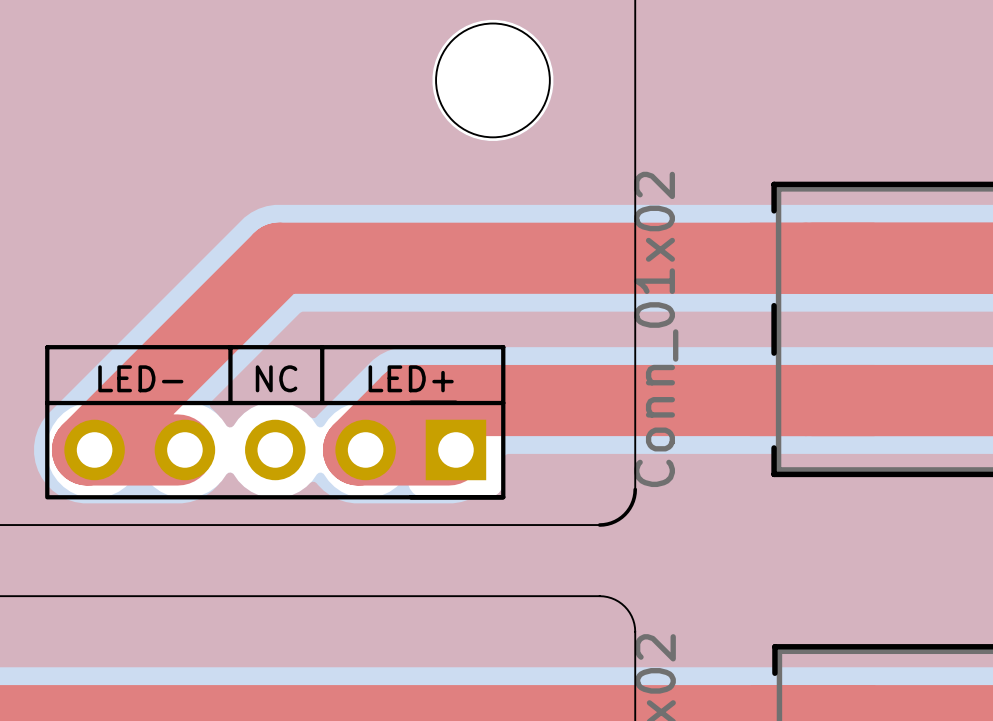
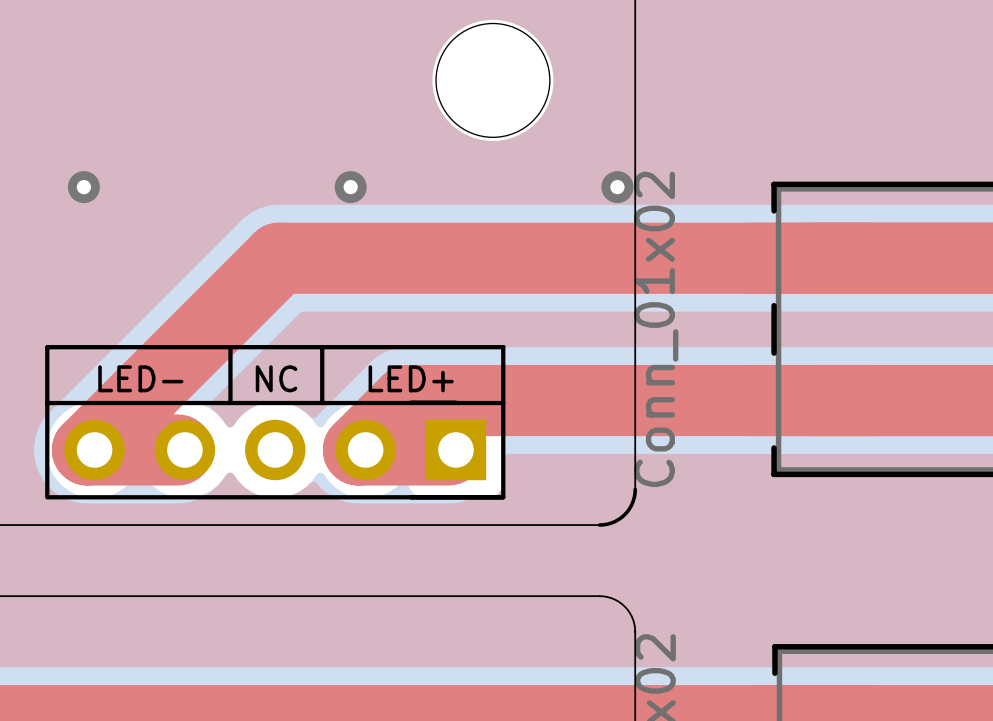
via: none -> (83, 187)
via: none -> (350, 187)
via: none -> (617, 187)

